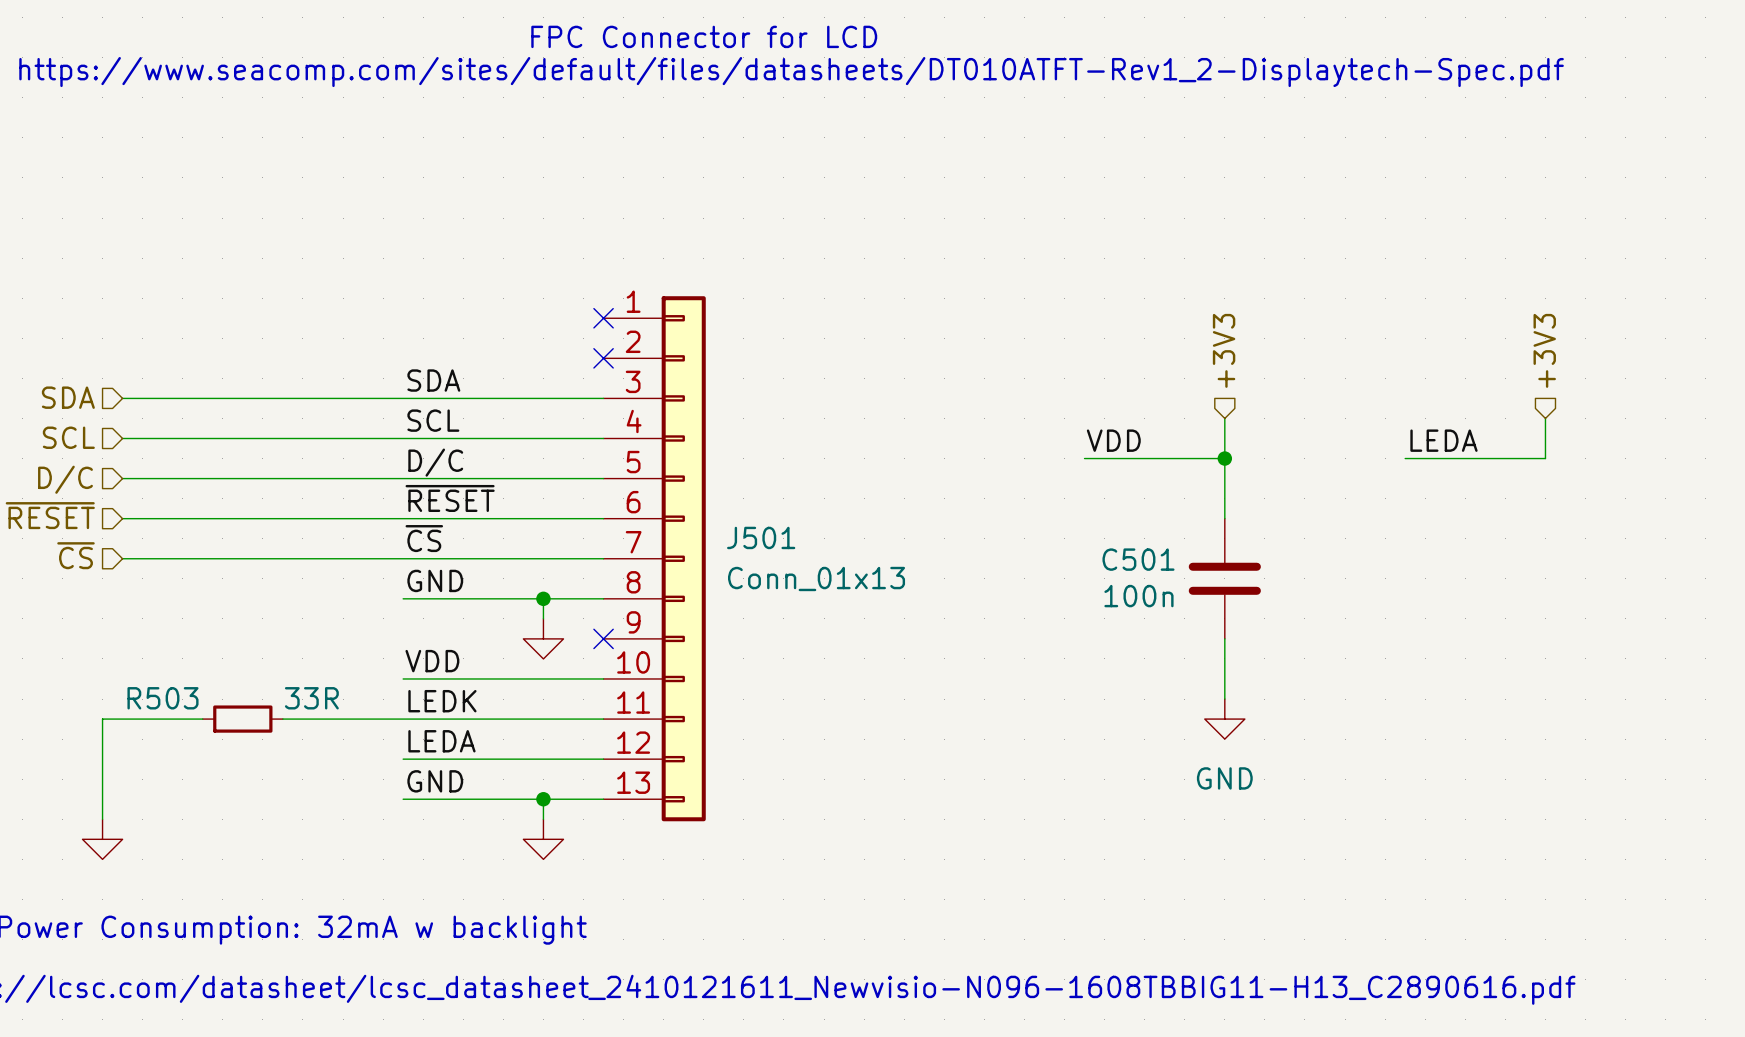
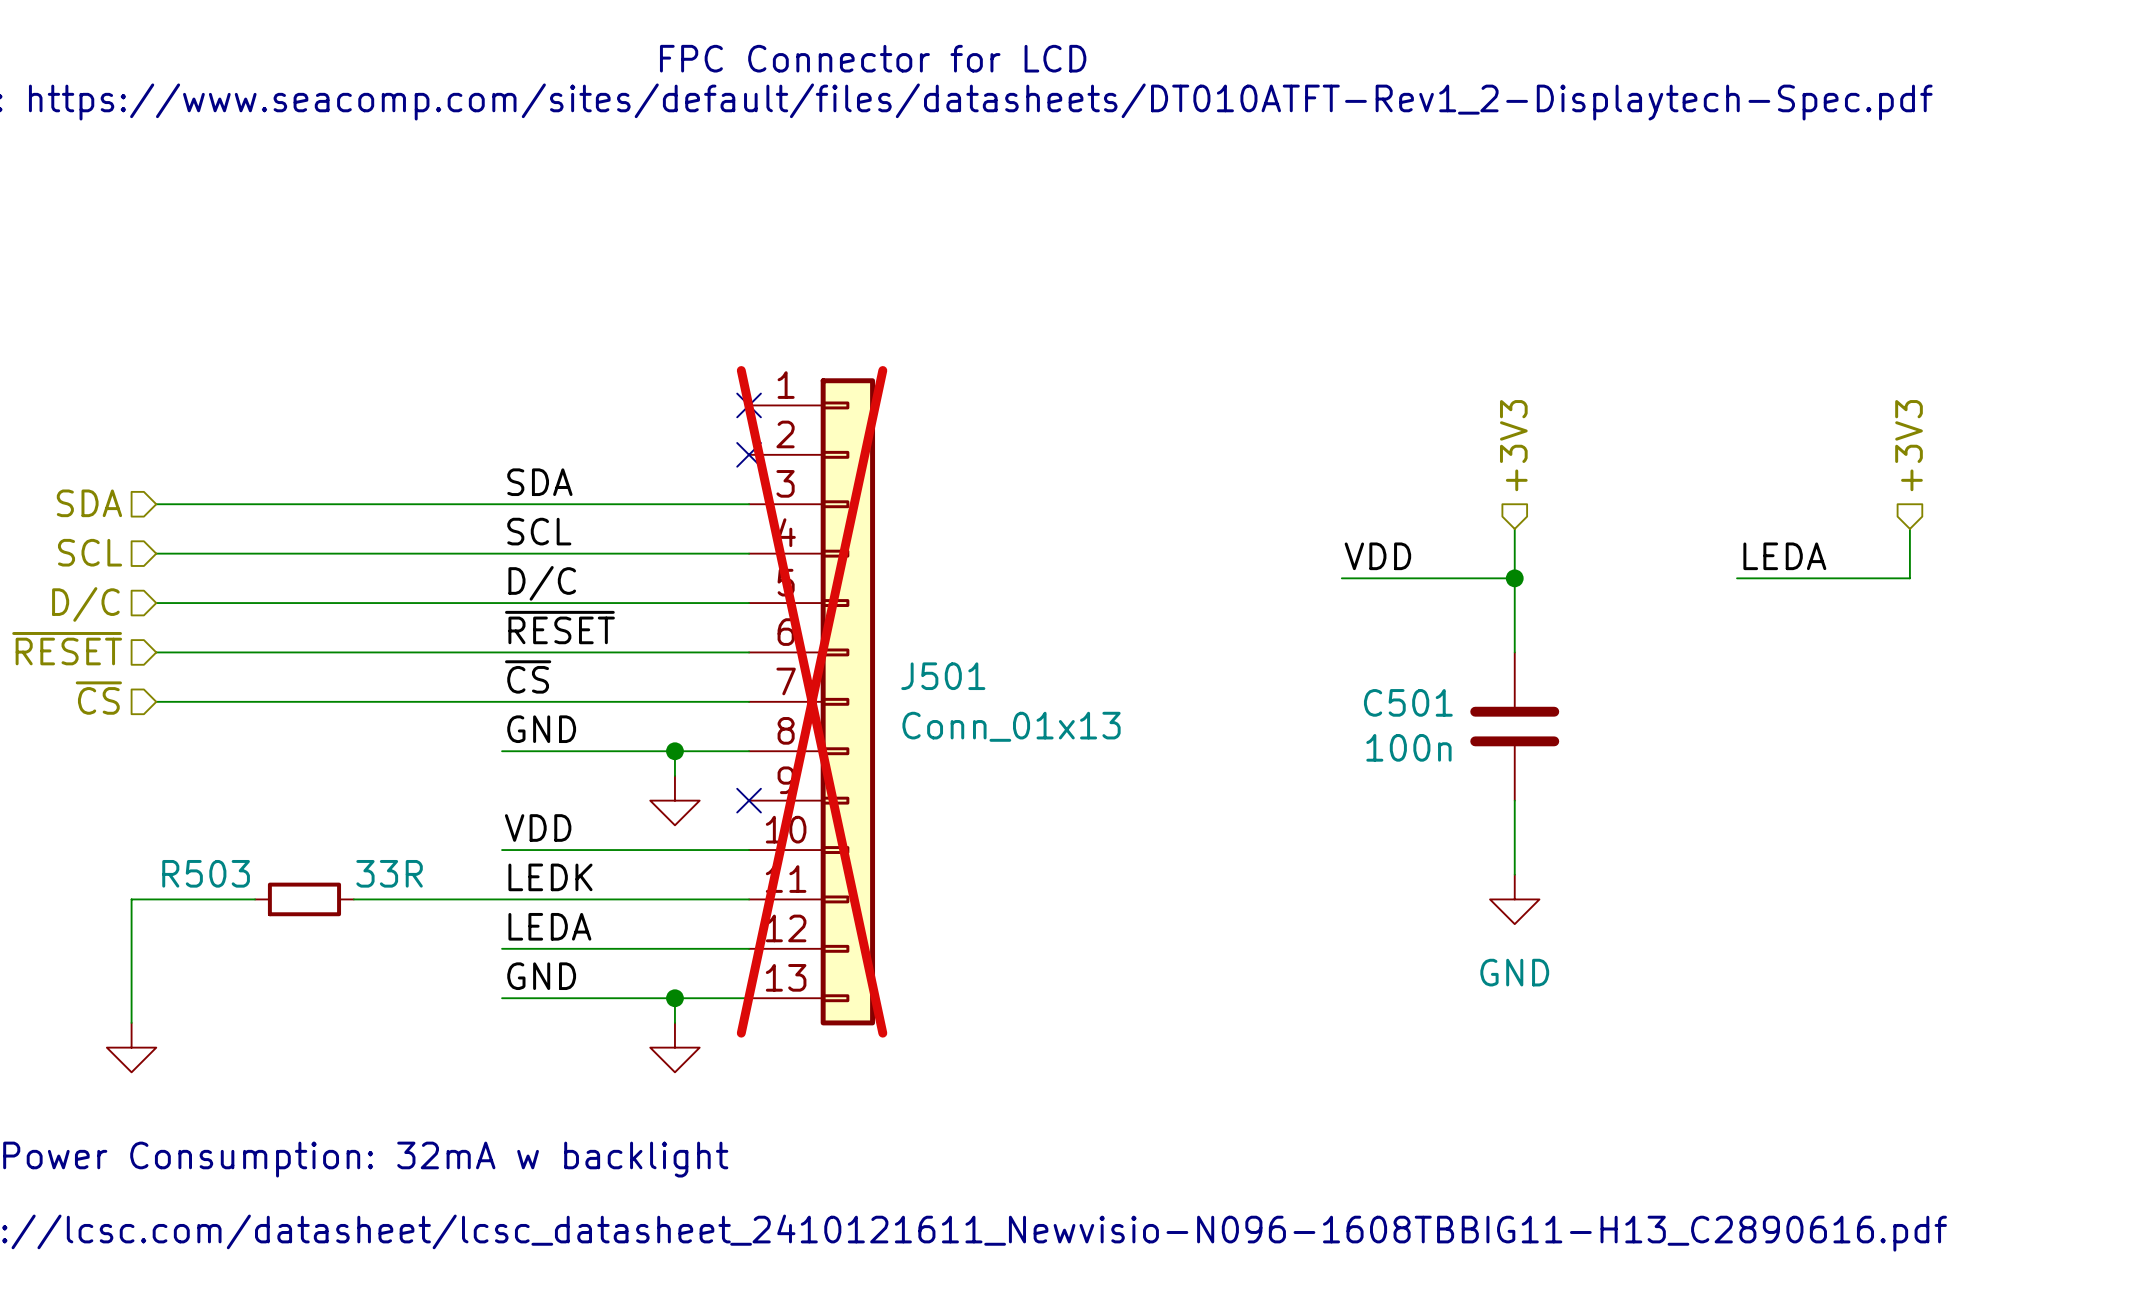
J501 do-not-place cross: none -> (812, 701)

